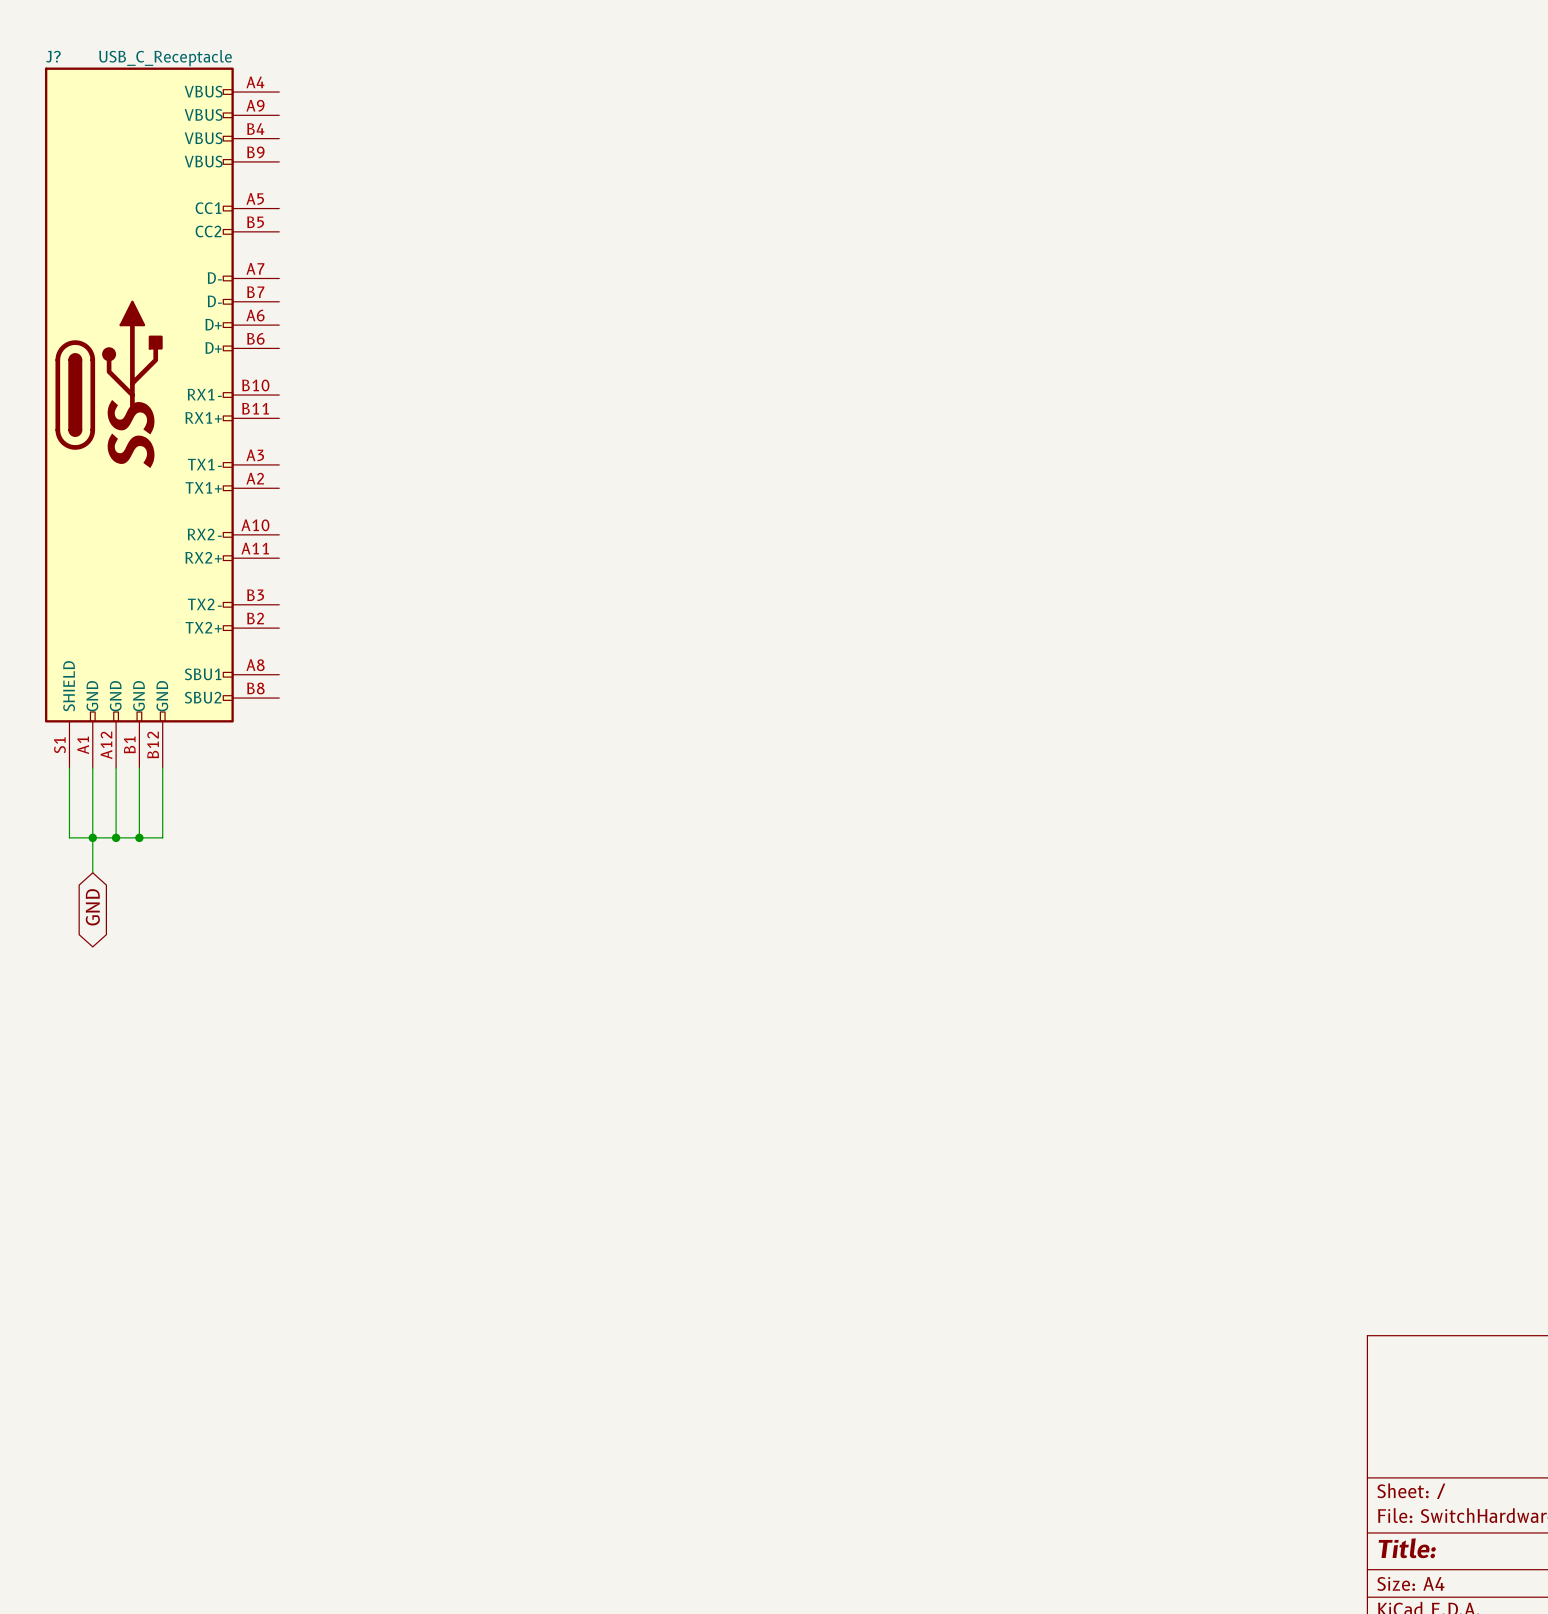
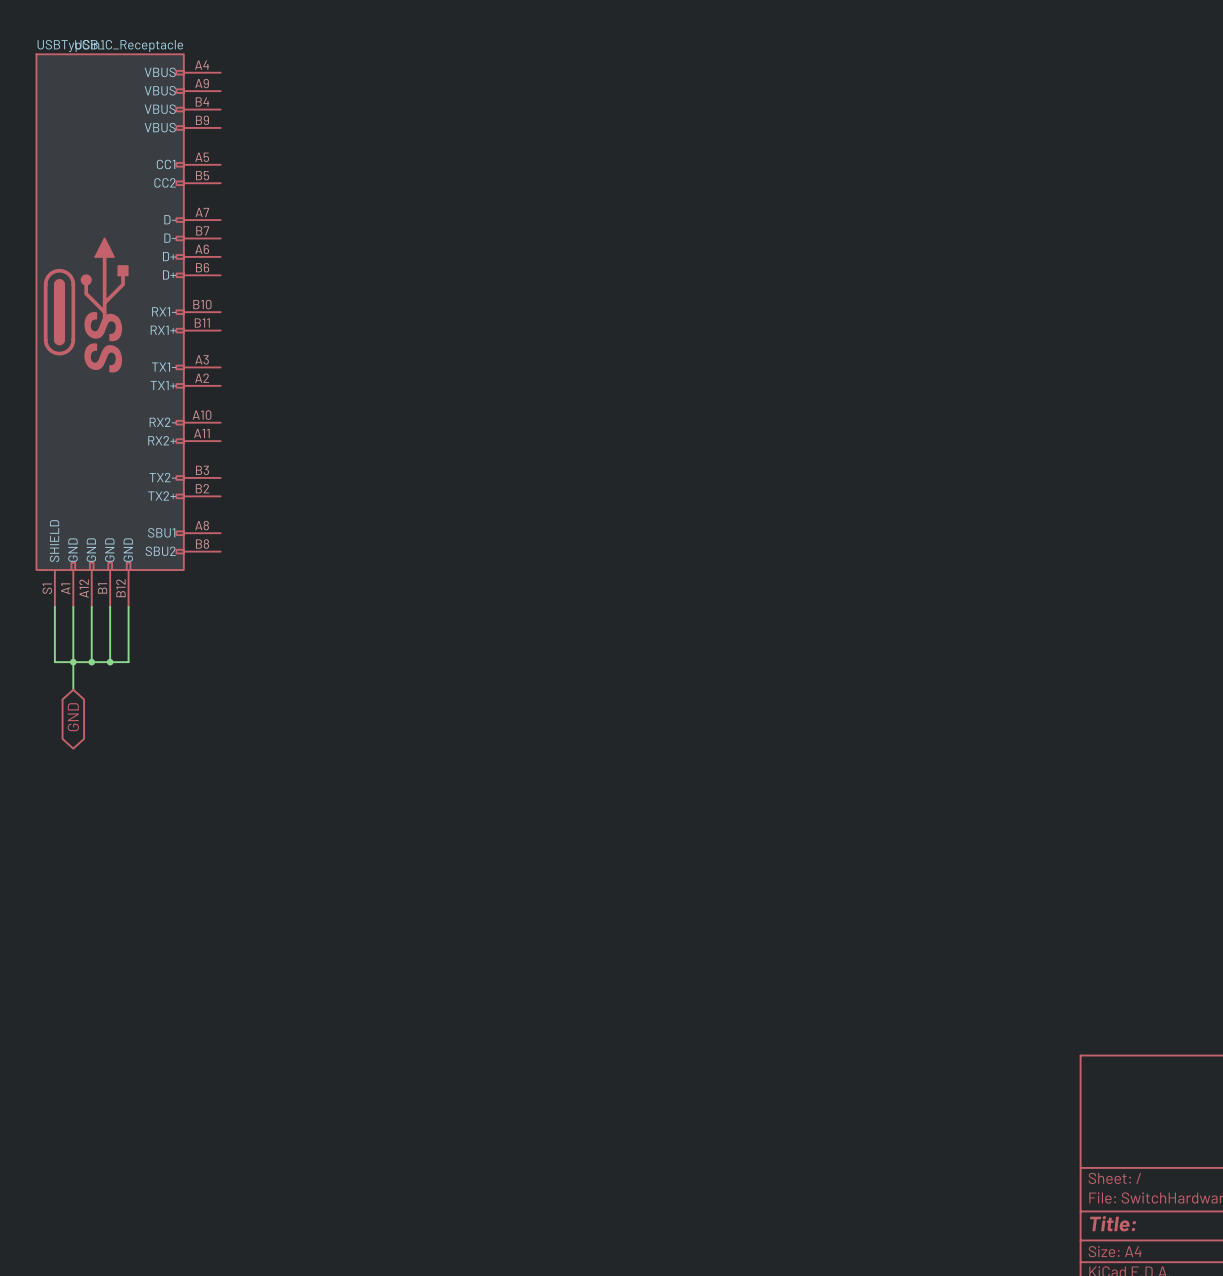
J? name: J? (53, 56) -> USBTypCin1 (70, 45)

